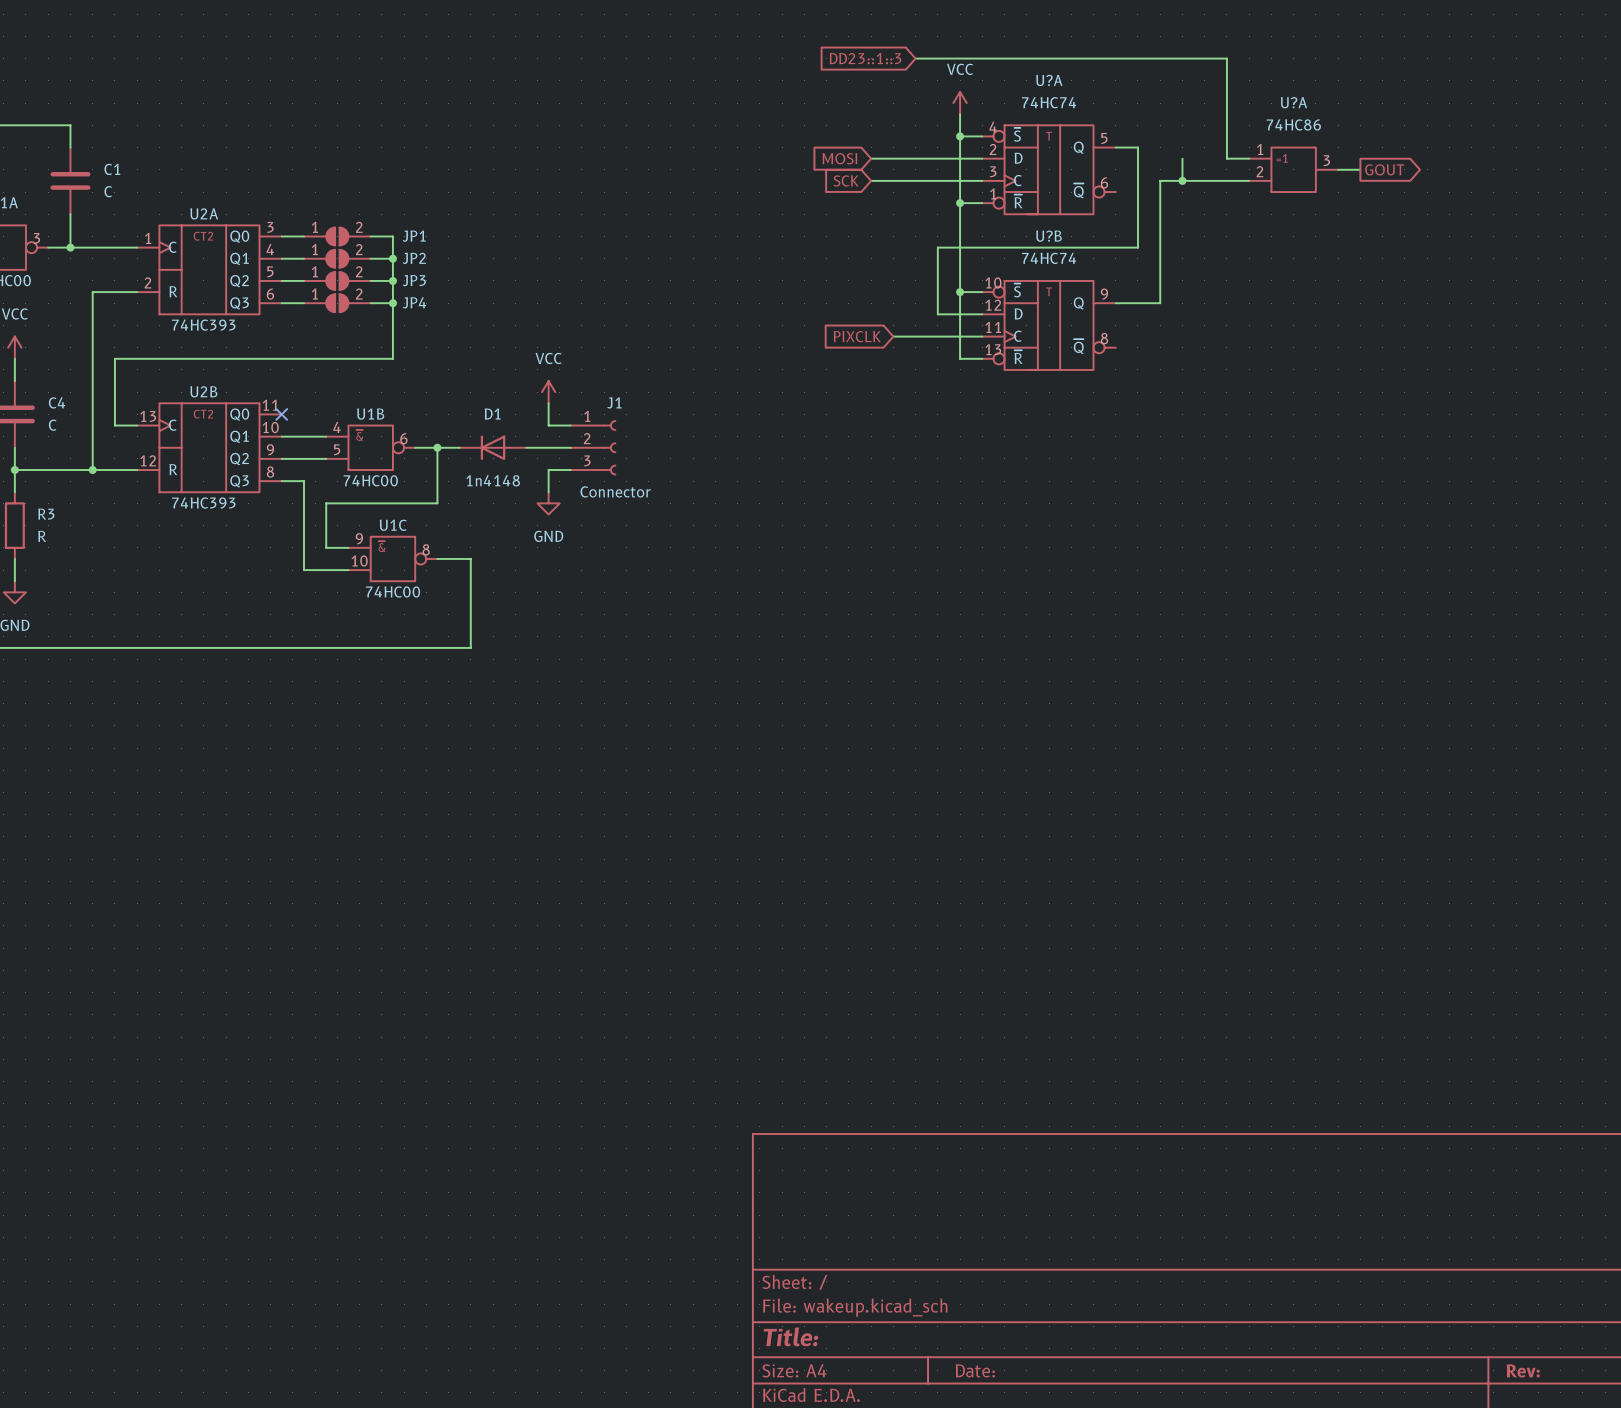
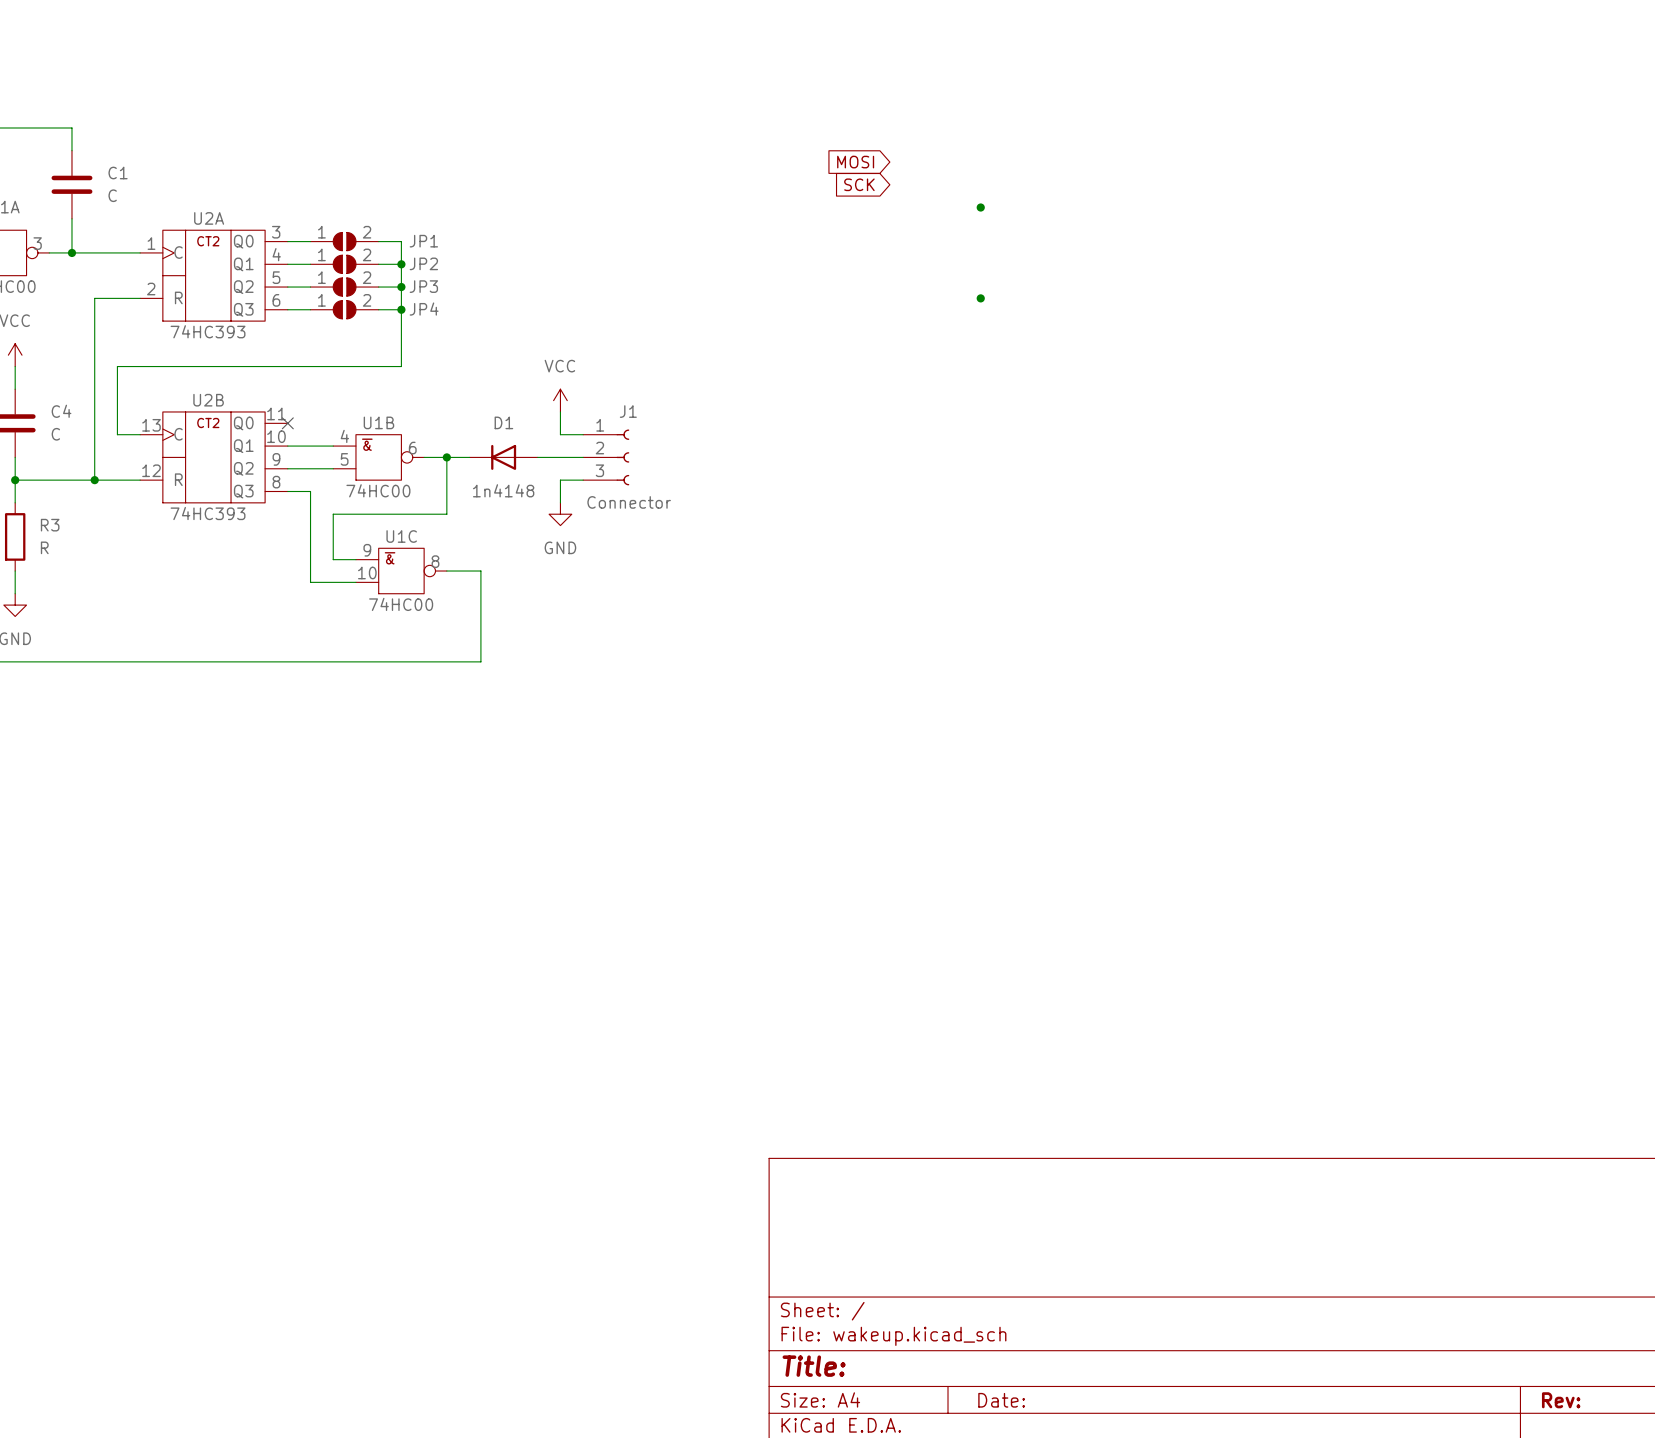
global label: DD23::1::3 (865, 58) -> none
wire: (915, 58) (1226, 58) (1226, 158) (1249, 158) -> none
power symbol: VCC (960, 103) -> none
wire: (960, 114) (960, 358) (982, 358) -> none
wire: (960, 136) (982, 136) -> none
junction: (960, 136) -> none
wire: (1115, 147) (1137, 147) (1137, 247) (937, 247) (937, 314) (982, 314) -> none
wire: (871, 158) (982, 158) -> none
wire: (1182, 158) (1182, 180) -> none
U?A: 74HC74 (1049, 169) -> none
U?A: 74HC86 (1293, 169) -> none
wire: (1338, 169) (1360, 169) -> none
global label: GOUT (1384, 169) -> none
wire: (871, 180) (982, 180) -> none
junction: (1182, 180) -> none
wire: (1249, 180) (1160, 180) (1160, 303) (1115, 303) -> none
wire: (960, 203) (982, 203) -> none
wire: (960, 292) (982, 292) -> none
U?B: 74HC74 (1049, 325) -> none
global label: PIXCLK (857, 336) -> none
wire: (893, 336) (982, 336) -> none

